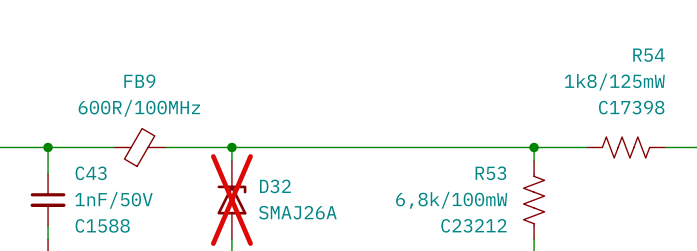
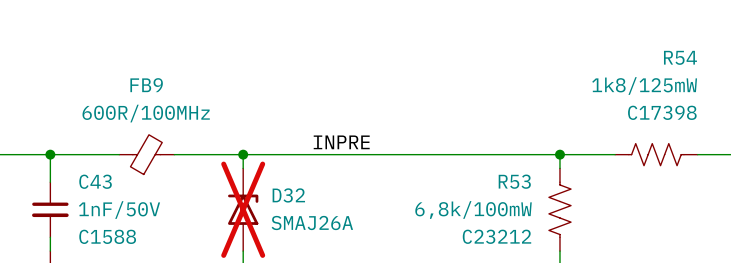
label: none -> INPRE (341, 142)

